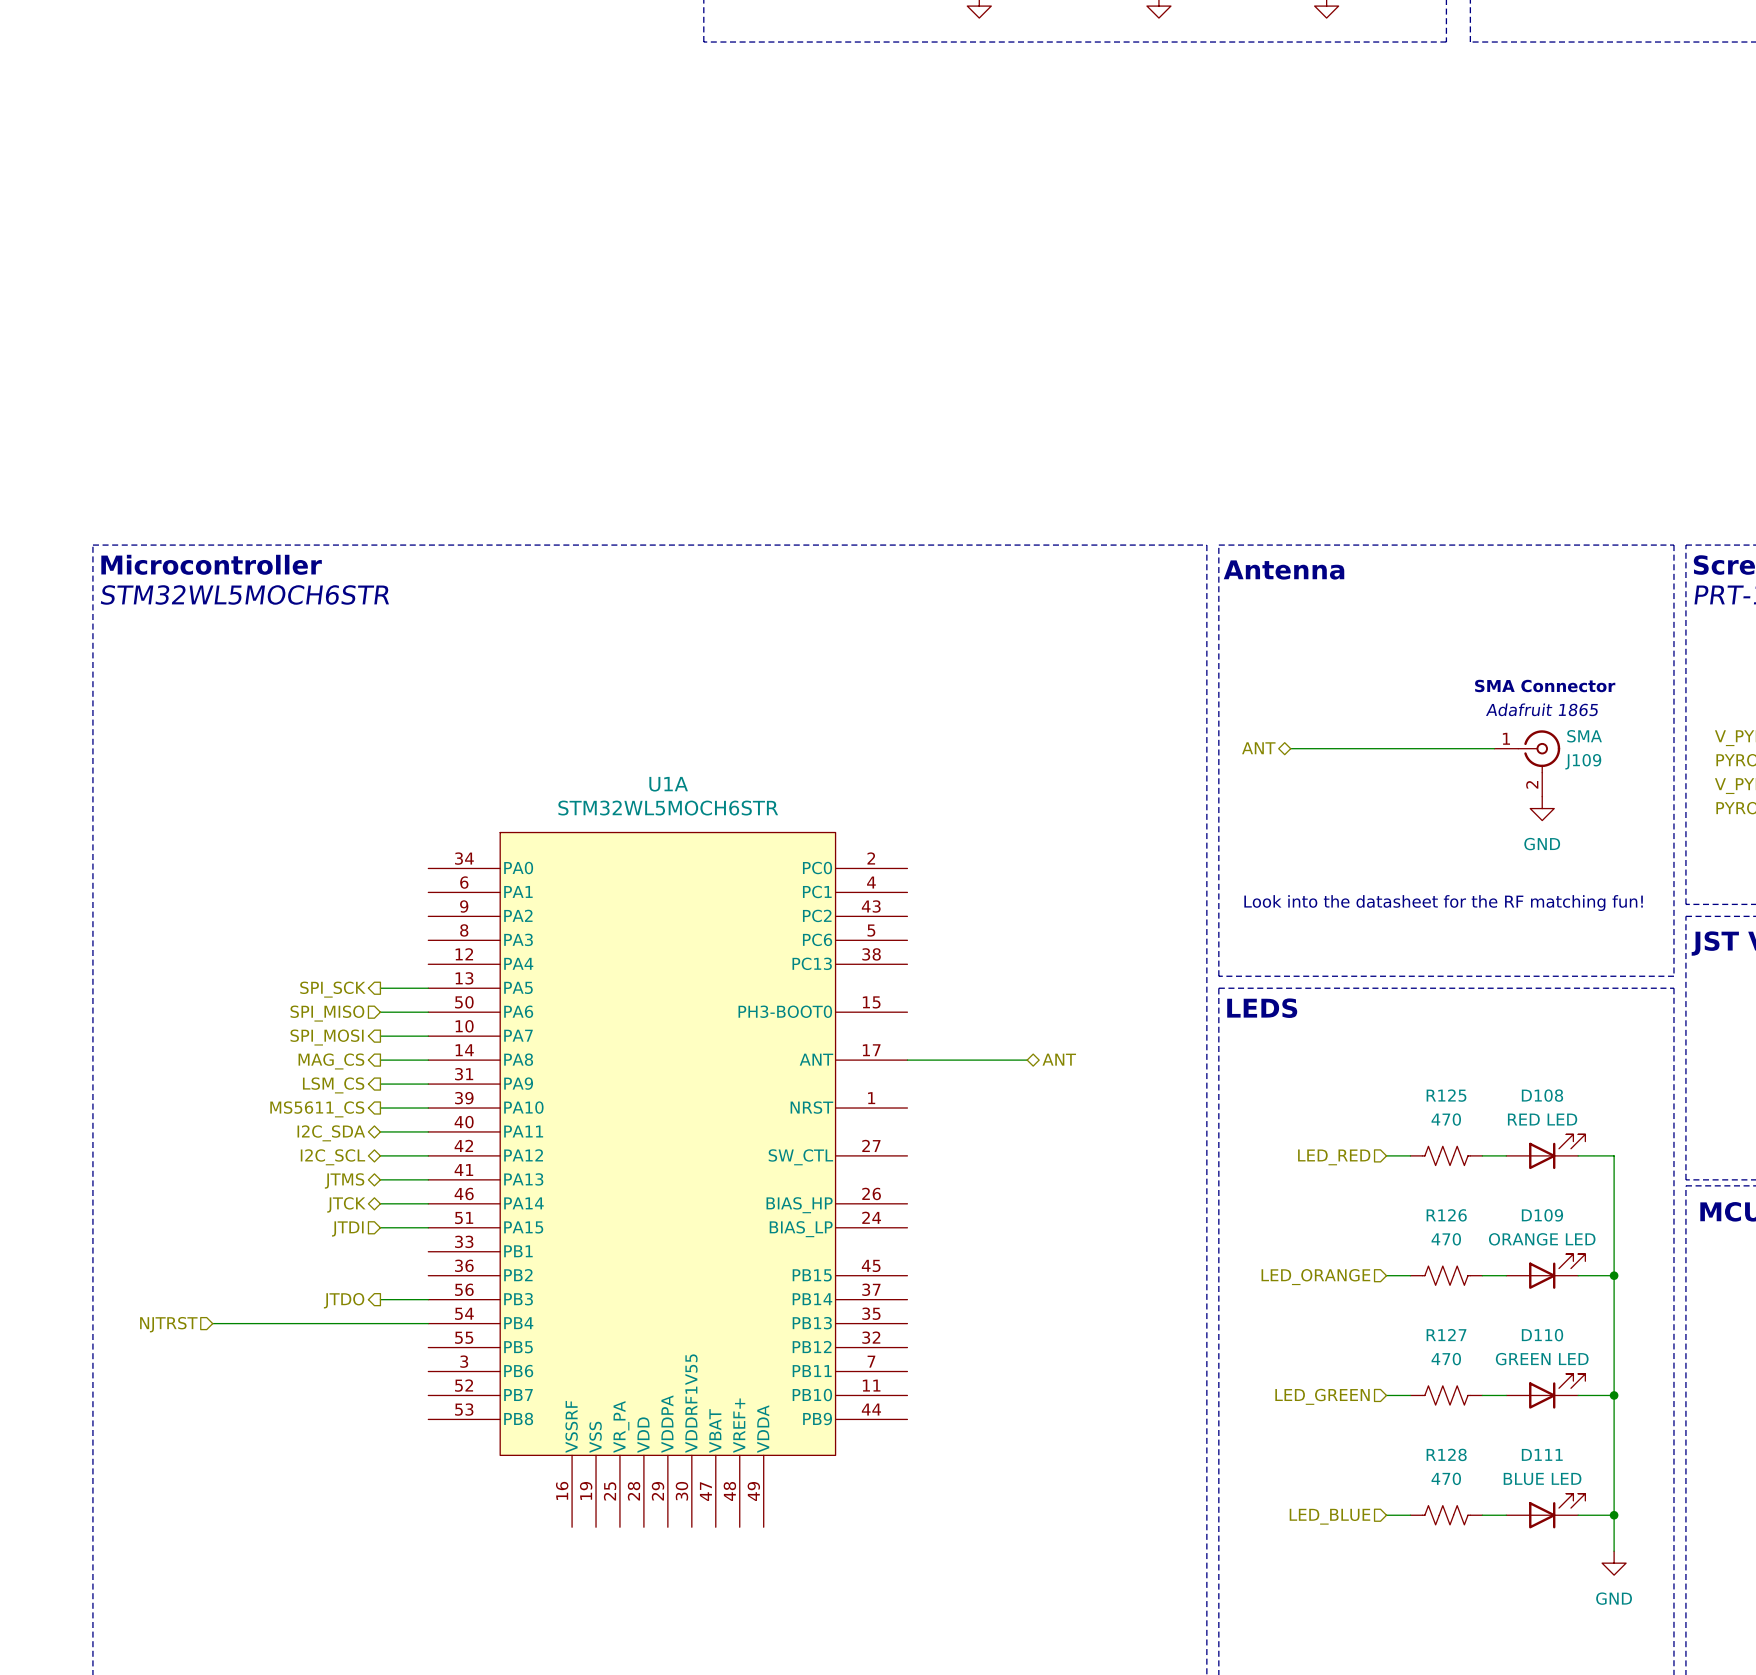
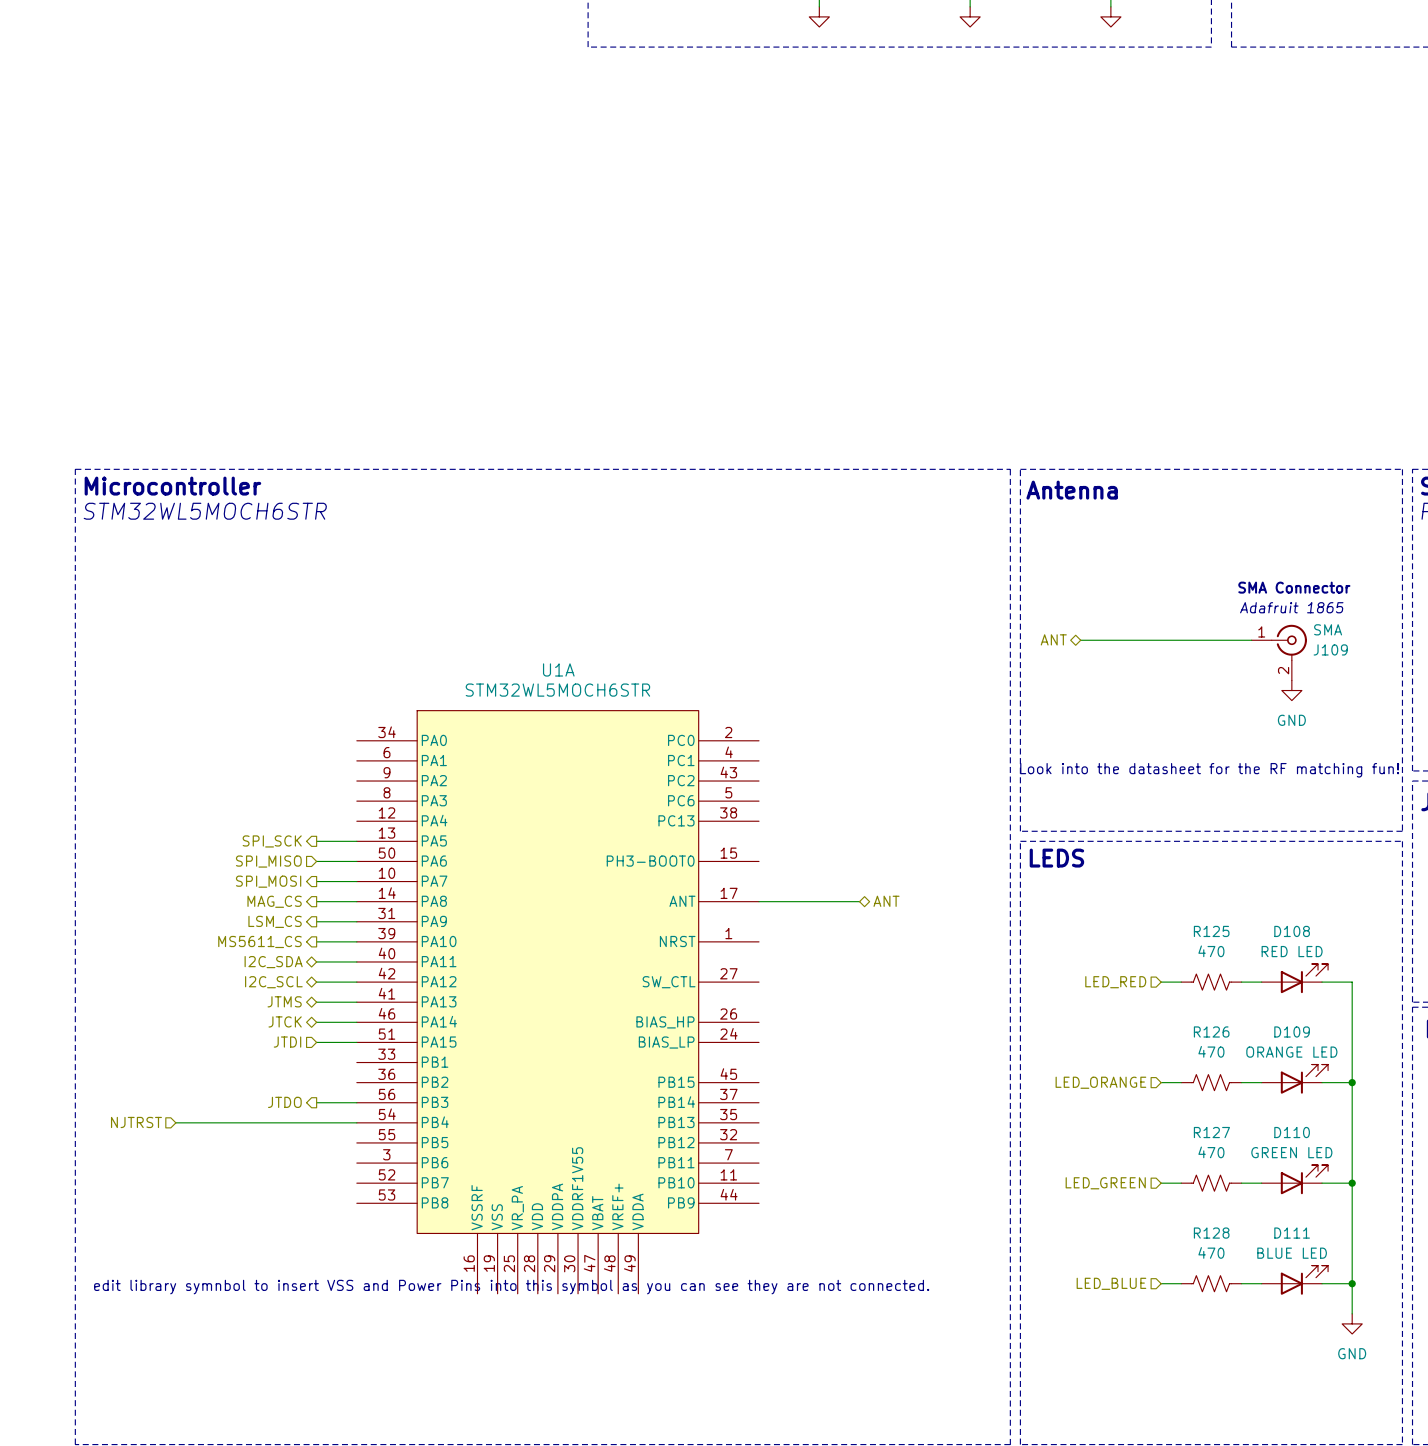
text: none -> edit library symnbol to insert VSS and Power Pins into this symbol as you can see they are not connected. (511, 1287)

